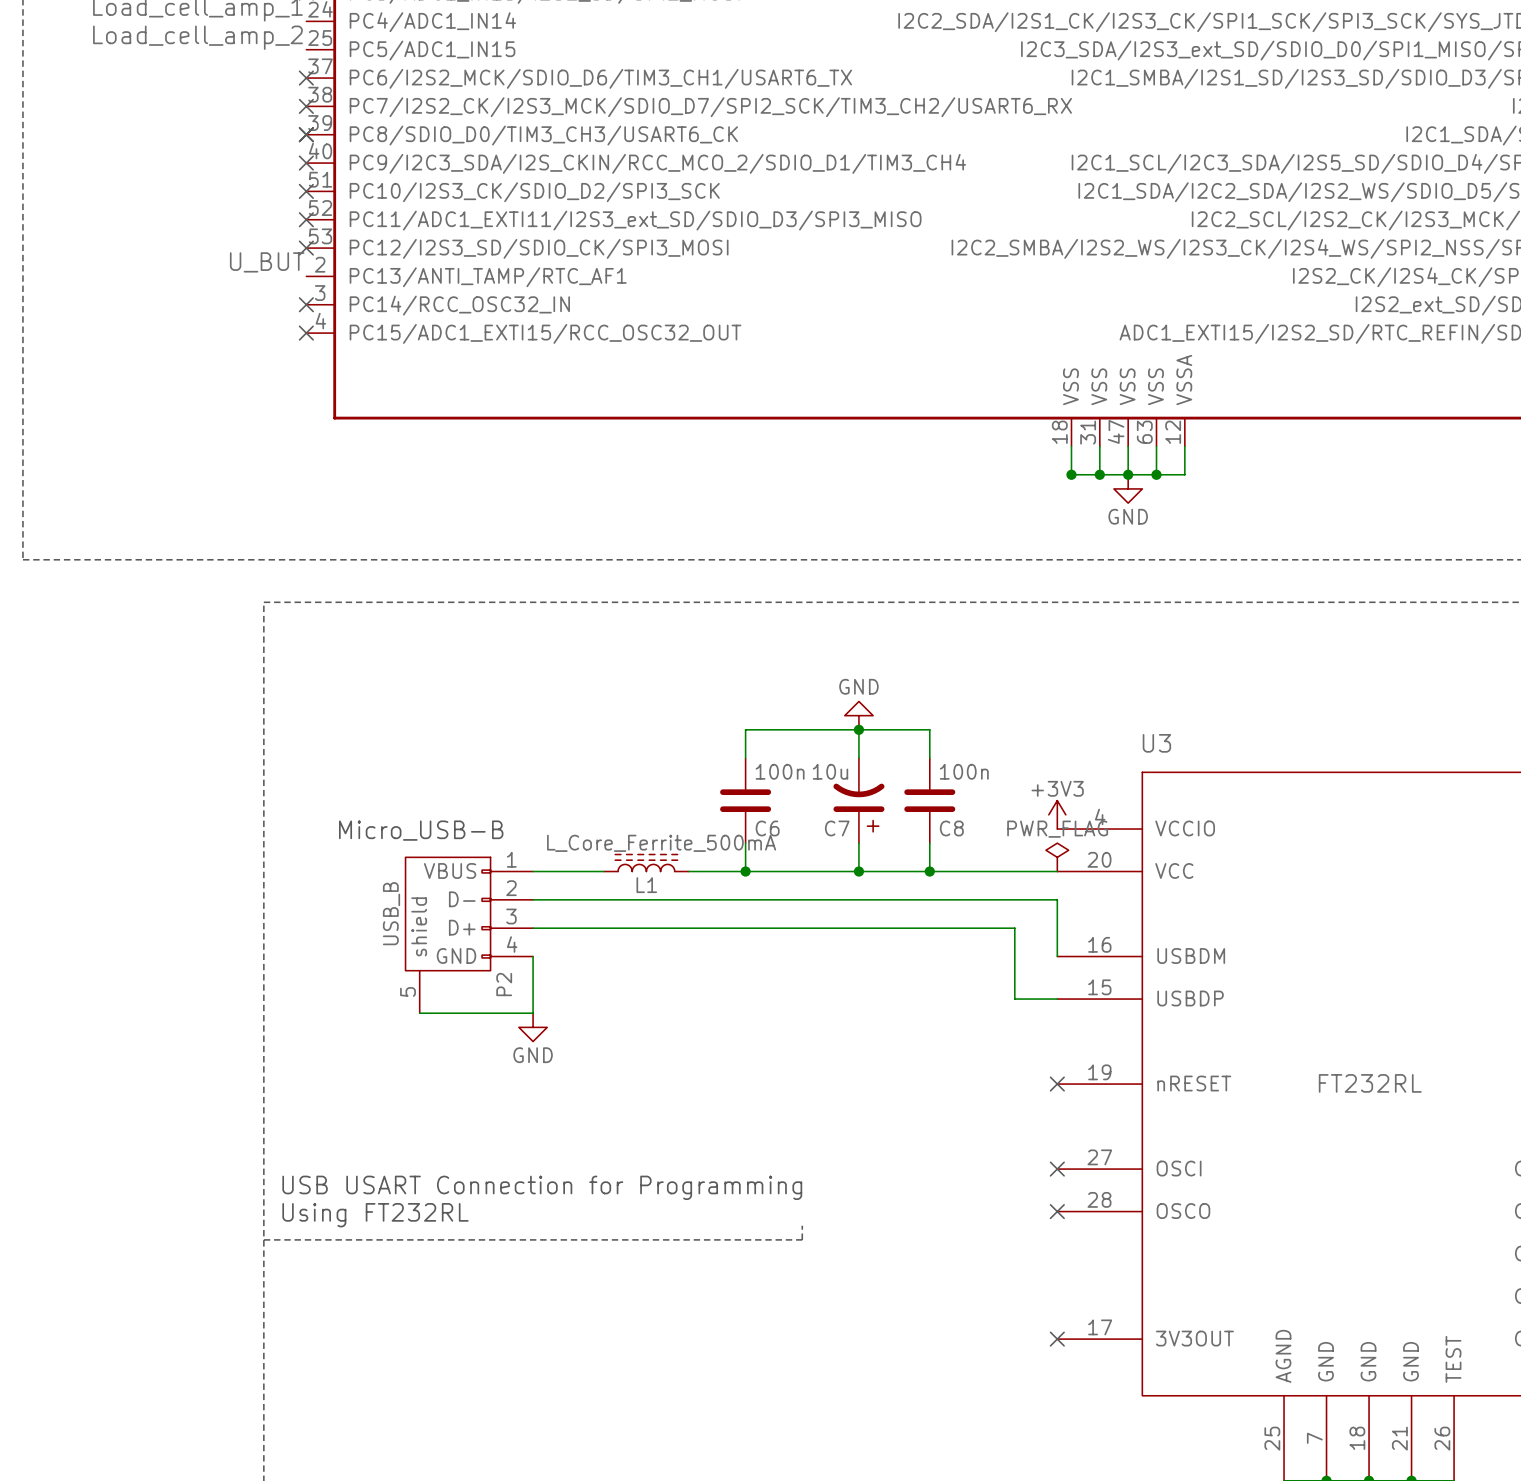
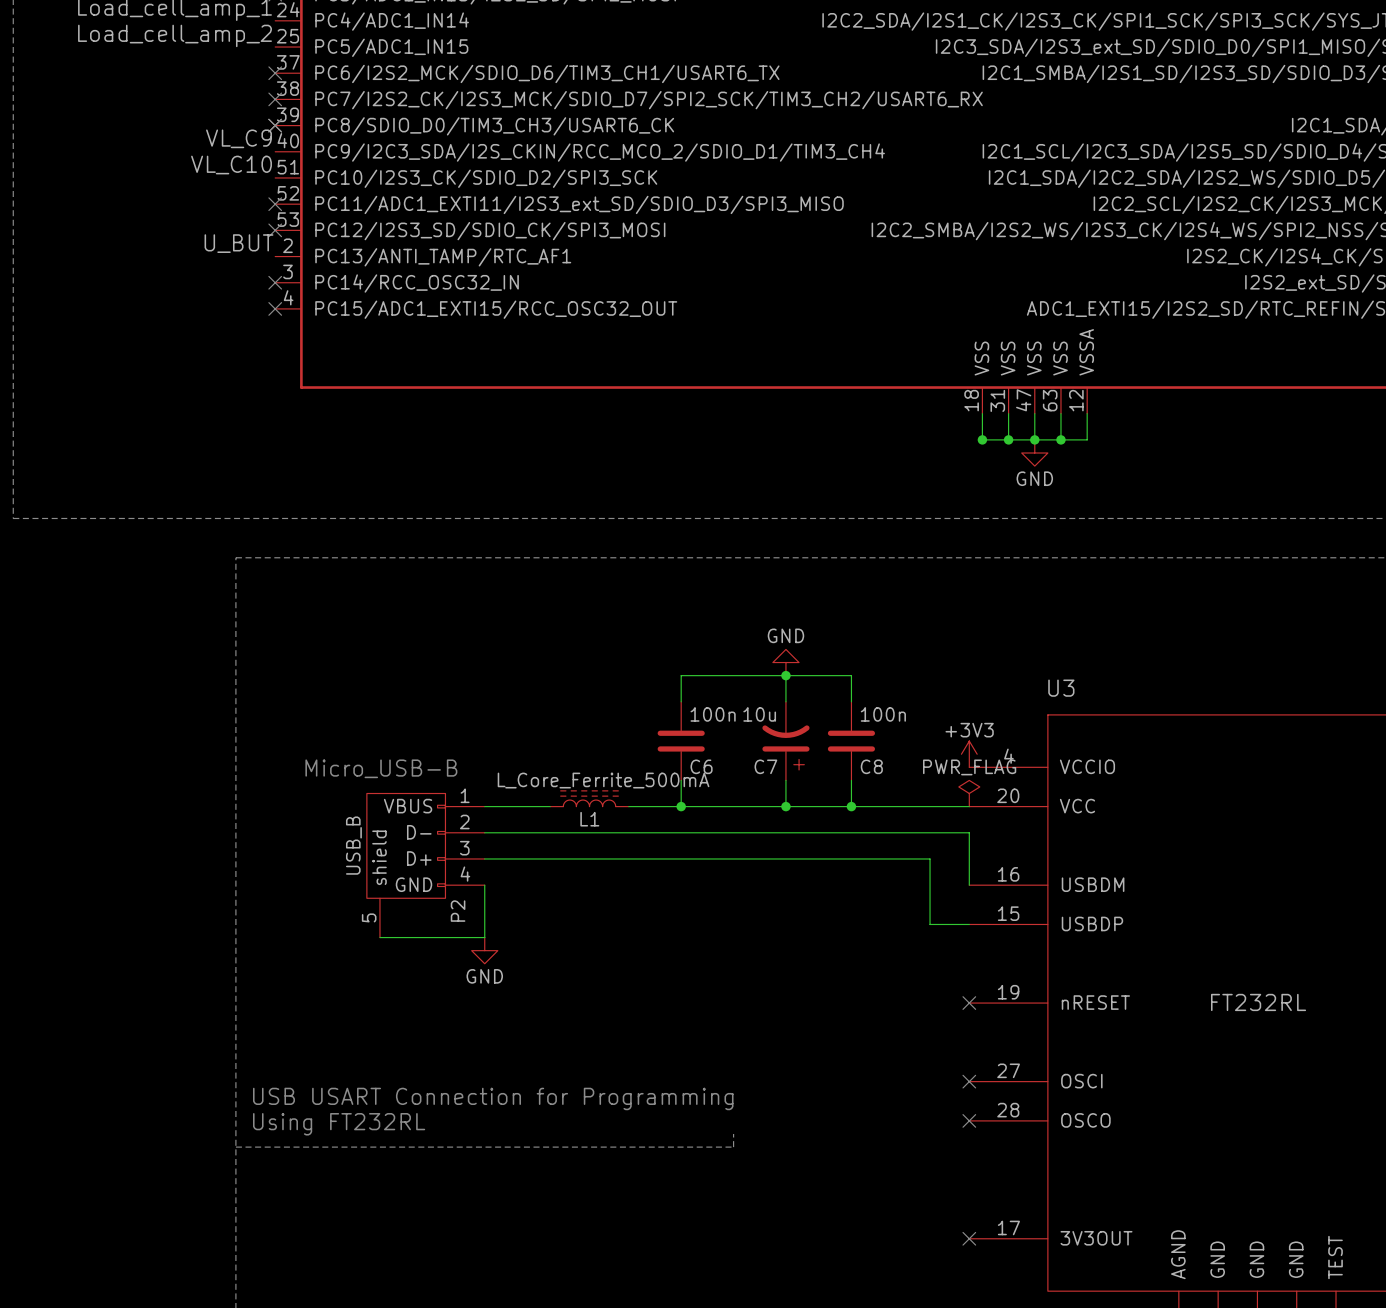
label: none -> VL_C9 (239, 138)
no-connect mark: (306, 163) -> none
label: none -> VL_C10 (231, 165)
no-connect mark: (306, 191) -> none

